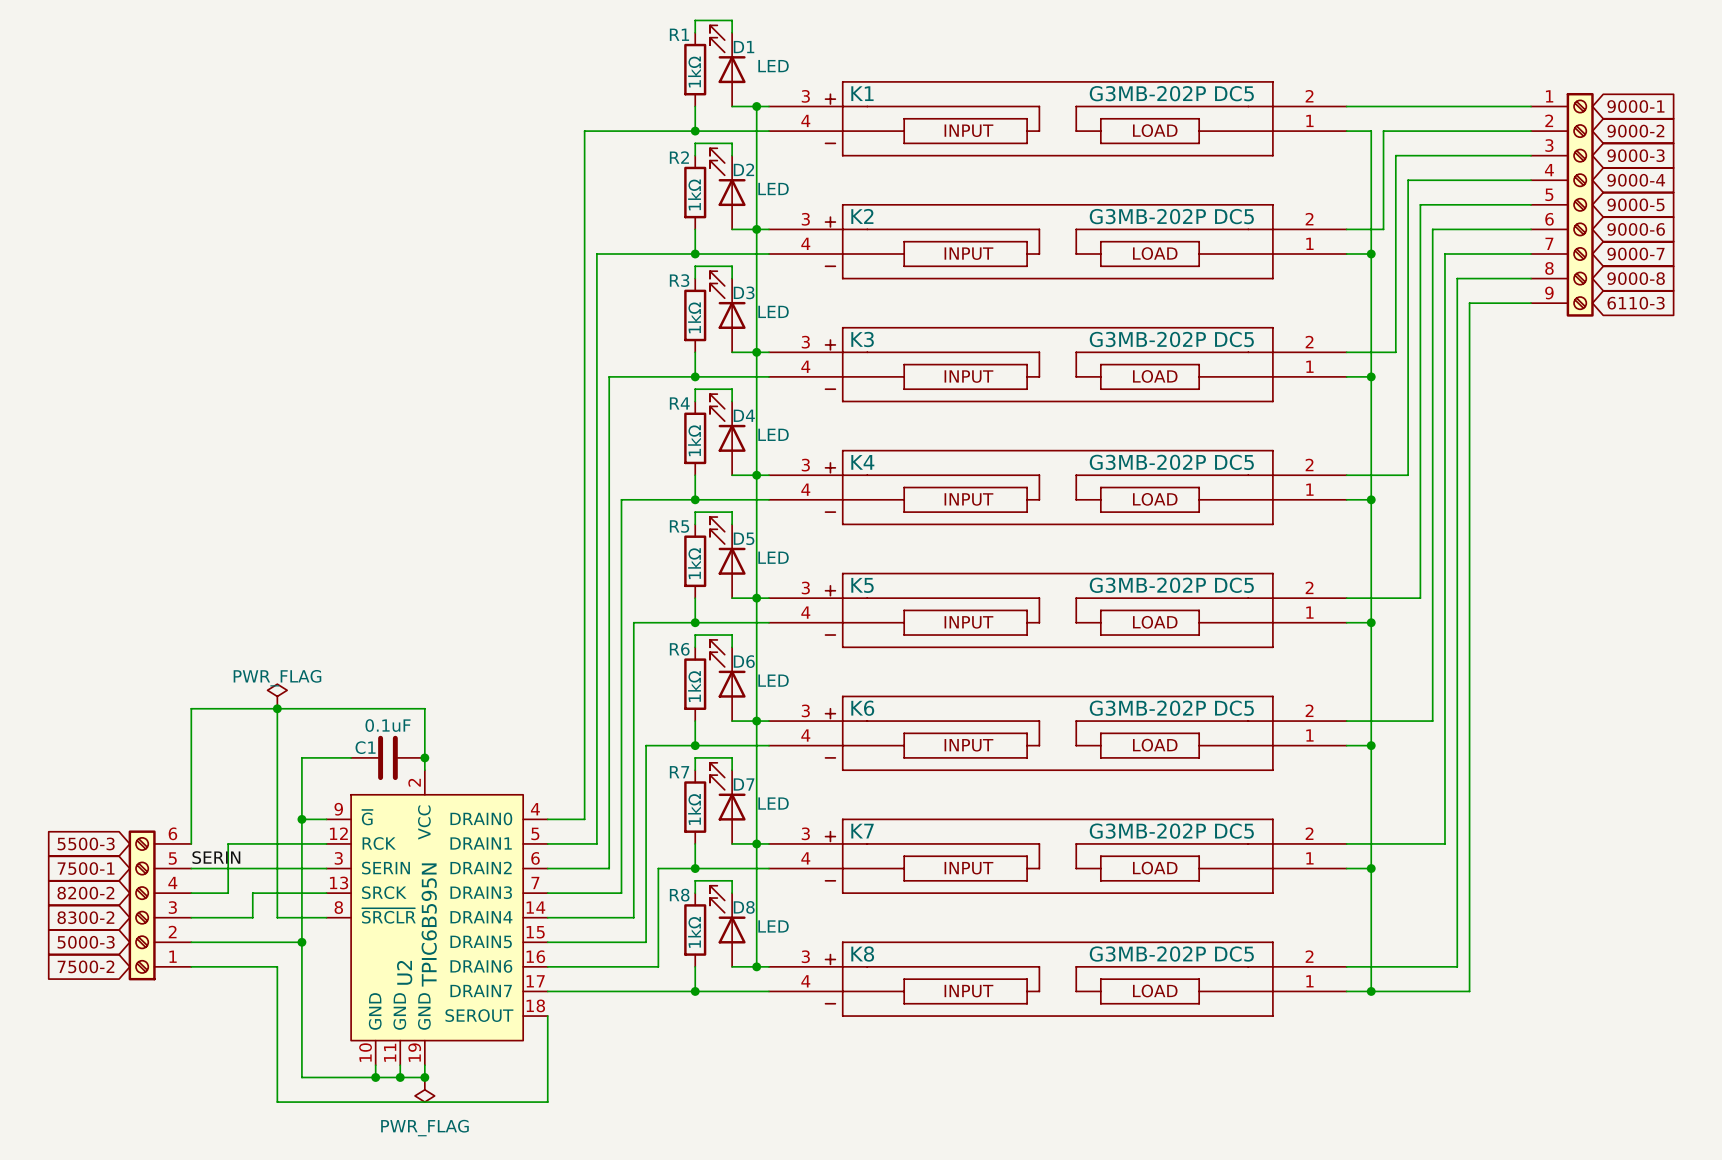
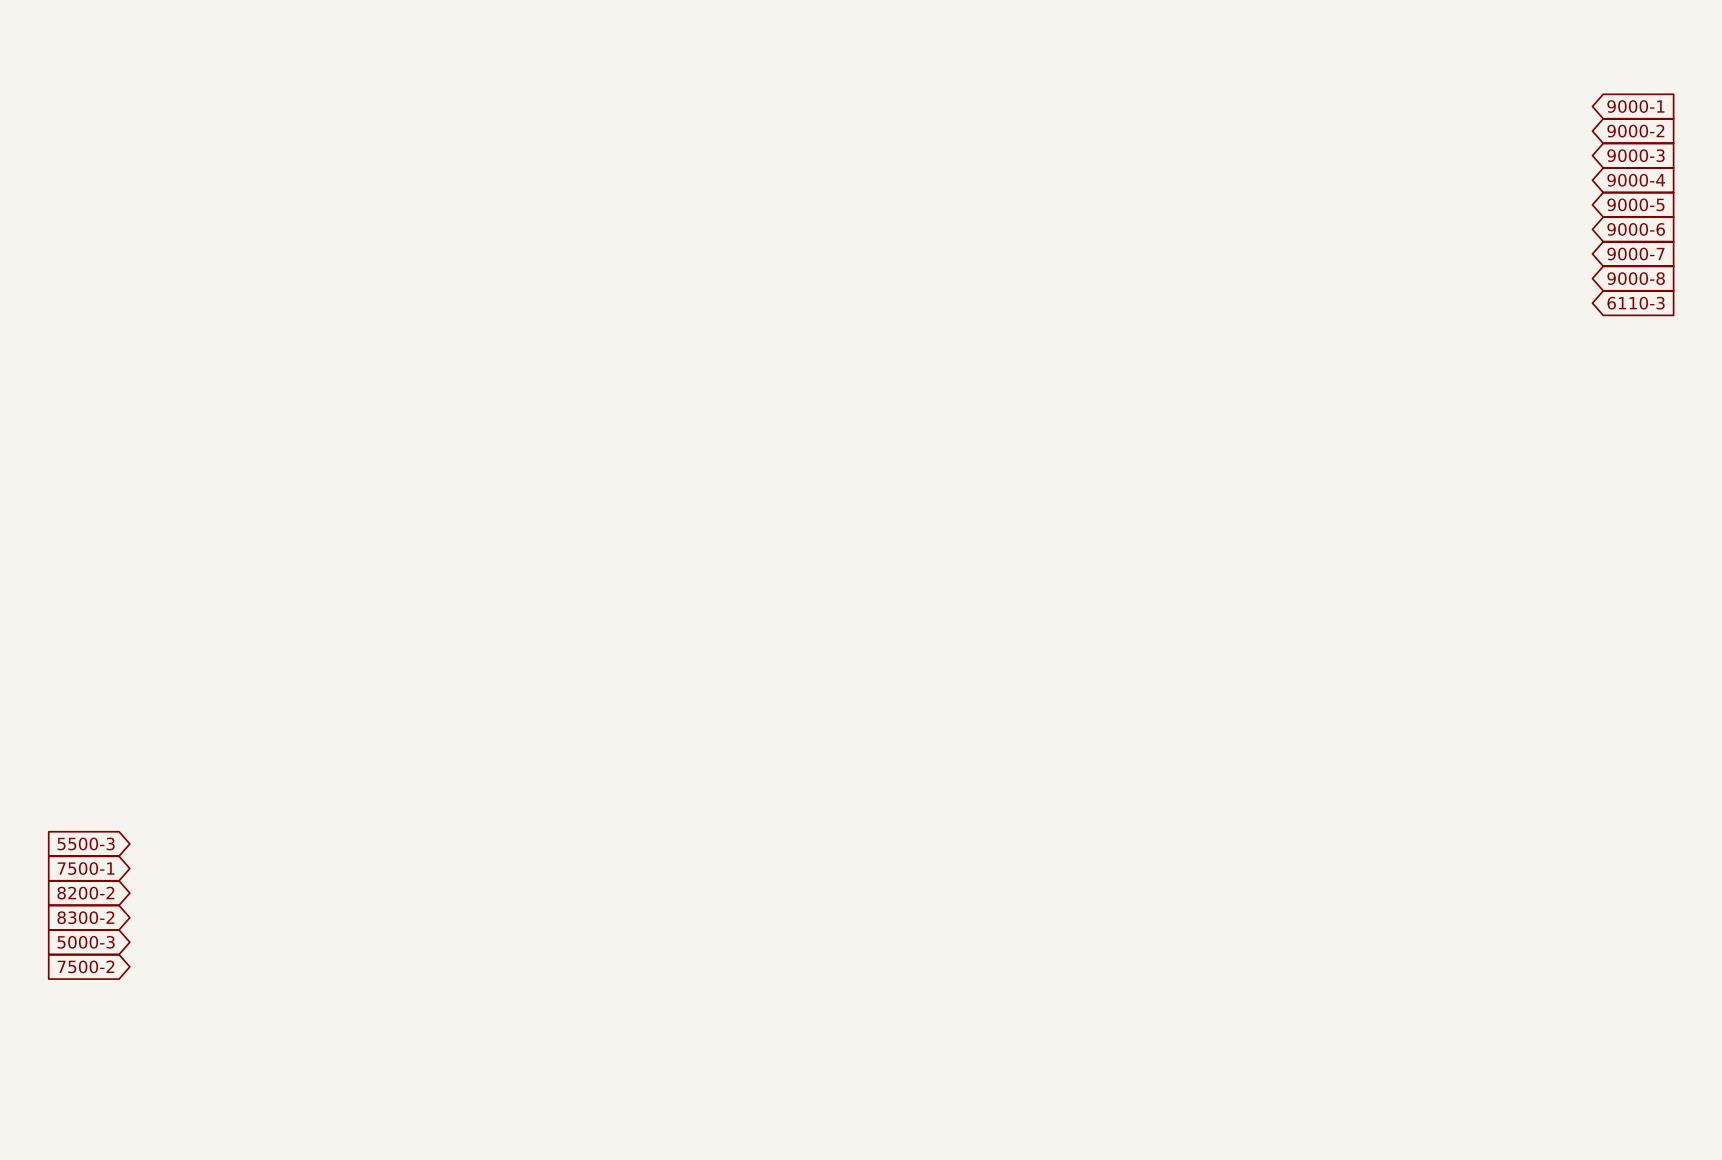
wire: (695, 32) (695, 20) (732, 20) (732, 32) -> none
D1: LED (727, 65) -> none
R1: 1kΩ (695, 69) -> none
wire: (695, 106) (695, 131) -> none
wire: (732, 106) (768, 106) -> none
wire: (756, 106) (756, 966) -> none
junction: (756, 106) -> none
wire: (1346, 106) (1531, 106) -> none
K1: G3MB-202P DC5 (1057, 118) -> none
junction: (695, 131) -> none
wire: (768, 131) (584, 131) (584, 819) (547, 819) -> none
wire: (1346, 131) (1371, 131) (1371, 991) -> none
wire: (1531, 131) (1383, 131) (1383, 229) (1346, 229) -> none
wire: (695, 155) (695, 143) (732, 143) (732, 155) -> none
wire: (1531, 155) (1395, 155) (1395, 352) (1346, 352) -> none
wire: (1531, 180) (1408, 180) (1408, 475) (1346, 475) -> none
D2: LED (727, 188) -> none
R2: 1kΩ (695, 192) -> none
wire: (1531, 204) (1420, 204) (1420, 598) (1346, 598) -> none
part: (1562, 204) -> none
wire: (695, 229) (695, 253) -> none
wire: (732, 229) (768, 229) -> none
junction: (756, 229) -> none
wire: (1531, 229) (1432, 229) (1432, 721) (1346, 721) -> none
K2: G3MB-202P DC5 (1057, 241) -> none
junction: (695, 253) -> none
wire: (768, 253) (596, 253) (596, 843) (547, 843) -> none
wire: (1346, 253) (1371, 253) -> none
junction: (1371, 253) -> none
wire: (1531, 253) (1444, 253) (1444, 843) (1346, 843) -> none
wire: (695, 278) (695, 266) (732, 266) (732, 278) -> none
wire: (1531, 278) (1457, 278) (1457, 966) (1346, 966) -> none
wire: (1531, 303) (1469, 303) (1469, 991) (1346, 991) -> none
D3: LED (727, 311) -> none
R3: 1kΩ (695, 315) -> none
wire: (695, 352) (695, 376) -> none
wire: (732, 352) (768, 352) -> none
junction: (756, 352) -> none
K3: G3MB-202P DC5 (1057, 364) -> none
junction: (695, 376) -> none
wire: (768, 376) (609, 376) (609, 868) (547, 868) -> none
wire: (1346, 376) (1371, 376) -> none
junction: (1371, 376) -> none
wire: (695, 401) (695, 389) (732, 389) (732, 401) -> none
D4: LED (727, 434) -> none
R4: 1kΩ (695, 438) -> none
wire: (695, 475) (695, 499) -> none
wire: (732, 475) (768, 475) -> none
junction: (756, 475) -> none
K4: G3MB-202P DC5 (1057, 487) -> none
junction: (695, 499) -> none
wire: (768, 499) (621, 499) (621, 893) (547, 893) -> none
wire: (1346, 499) (1371, 499) -> none
junction: (1371, 499) -> none
wire: (695, 524) (695, 512) (732, 512) (732, 524) -> none
D5: LED (727, 557) -> none
R5: 1kΩ (695, 561) -> none
wire: (695, 598) (695, 622) -> none
wire: (732, 598) (768, 598) -> none
junction: (756, 598) -> none
K5: G3MB-202P DC5 (1057, 610) -> none
junction: (695, 622) -> none
wire: (768, 622) (633, 622) (633, 917) (547, 917) -> none
wire: (1346, 622) (1371, 622) -> none
junction: (1371, 622) -> none
wire: (695, 647) (695, 635) (732, 635) (732, 647) -> none
D6: LED (727, 680) -> none
R6: 1kΩ (695, 684) -> none
power symbol: PWR_FLAG (277, 696) -> none
wire: (277, 708) (277, 917) (326, 917) -> none
junction: (277, 708) -> none
wire: (695, 721) (695, 745) -> none
wire: (732, 721) (768, 721) -> none
junction: (756, 721) -> none
K6: G3MB-202P DC5 (1057, 733) -> none
junction: (695, 745) -> none
wire: (768, 745) (646, 745) (646, 942) (547, 942) -> none
wire: (1346, 745) (1371, 745) -> none
junction: (1371, 745) -> none
wire: (351, 757) (301, 757) (301, 1077) (424, 1077) (424, 1065) -> none
C1: 0.1uF (387, 757) -> none
junction: (424, 757) -> none
wire: (424, 770) (424, 708) (191, 708) (191, 843) -> none
wire: (695, 770) (695, 757) (732, 757) (732, 770) -> none
D7: LED (727, 803) -> none
R7: 1kΩ (695, 807) -> none
wire: (301, 819) (326, 819) -> none
junction: (301, 819) -> none
wire: (326, 843) (228, 843) (228, 893) (191, 893) -> none
wire: (695, 843) (695, 868) -> none
wire: (732, 843) (768, 843) -> none
junction: (756, 843) -> none
K7: G3MB-202P DC5 (1057, 856) -> none
label: SERIN (216, 857) -> none
wire: (191, 868) (326, 868) -> none
junction: (695, 868) -> none
wire: (768, 868) (658, 868) (658, 966) (547, 966) -> none
wire: (1346, 868) (1371, 868) -> none
junction: (1371, 868) -> none
wire: (326, 893) (252, 893) (252, 917) (191, 917) -> none
wire: (695, 893) (695, 880) (732, 880) (732, 893) -> none
part: (159, 905) -> none
U2: TPIC6B595N (437, 917) -> none
D8: LED (727, 926) -> none
R8: 1kΩ (695, 929) -> none
wire: (191, 942) (301, 942) -> none
junction: (301, 942) -> none
wire: (191, 966) (277, 966) (277, 1102) (547, 1102) (547, 1016) -> none
wire: (695, 966) (695, 991) -> none
wire: (732, 966) (768, 966) -> none
junction: (756, 966) -> none
K8: G3MB-202P DC5 (1057, 979) -> none
wire: (547, 991) (768, 991) -> none
junction: (695, 991) -> none
junction: (1371, 991) -> none
wire: (375, 1065) (375, 1077) -> none
wire: (400, 1065) (400, 1077) -> none
junction: (375, 1077) -> none
junction: (400, 1077) -> none
junction: (424, 1077) -> none
power symbol: PWR_FLAG (424, 1089) -> none

